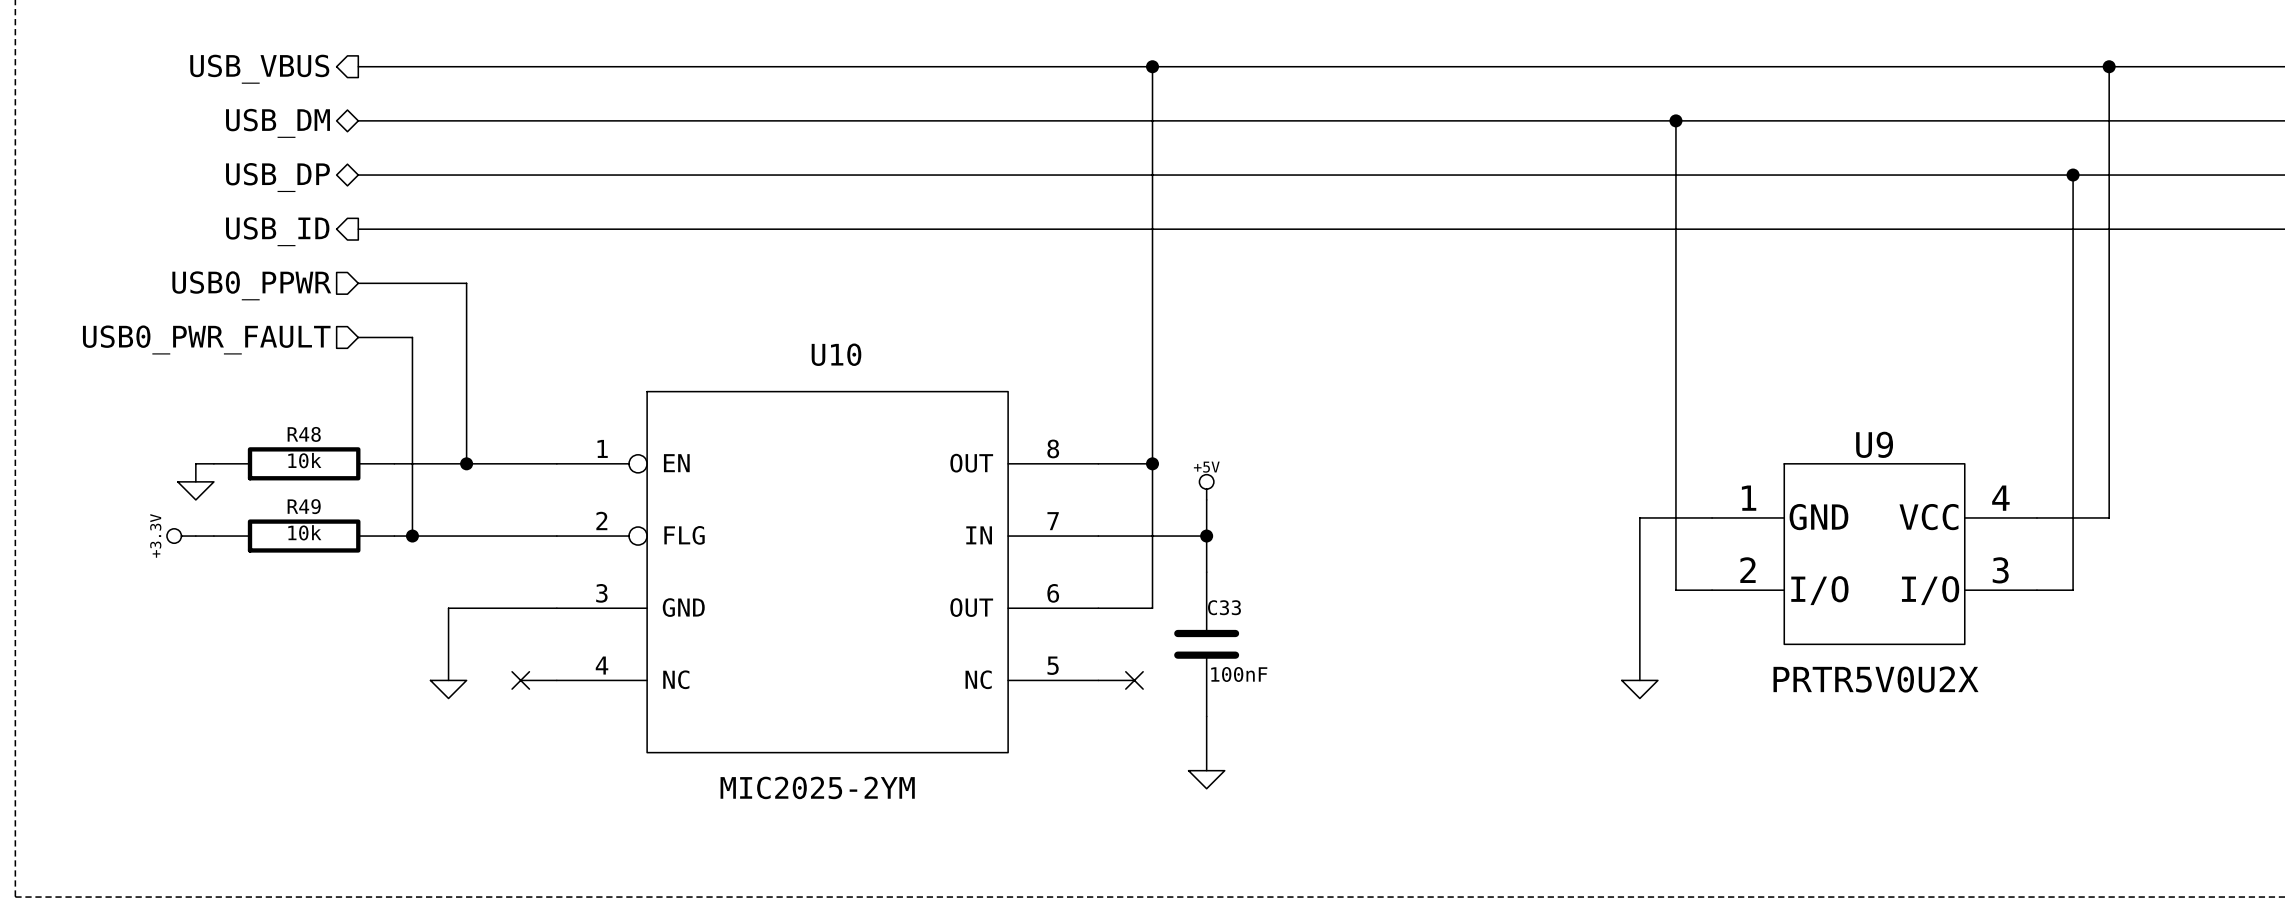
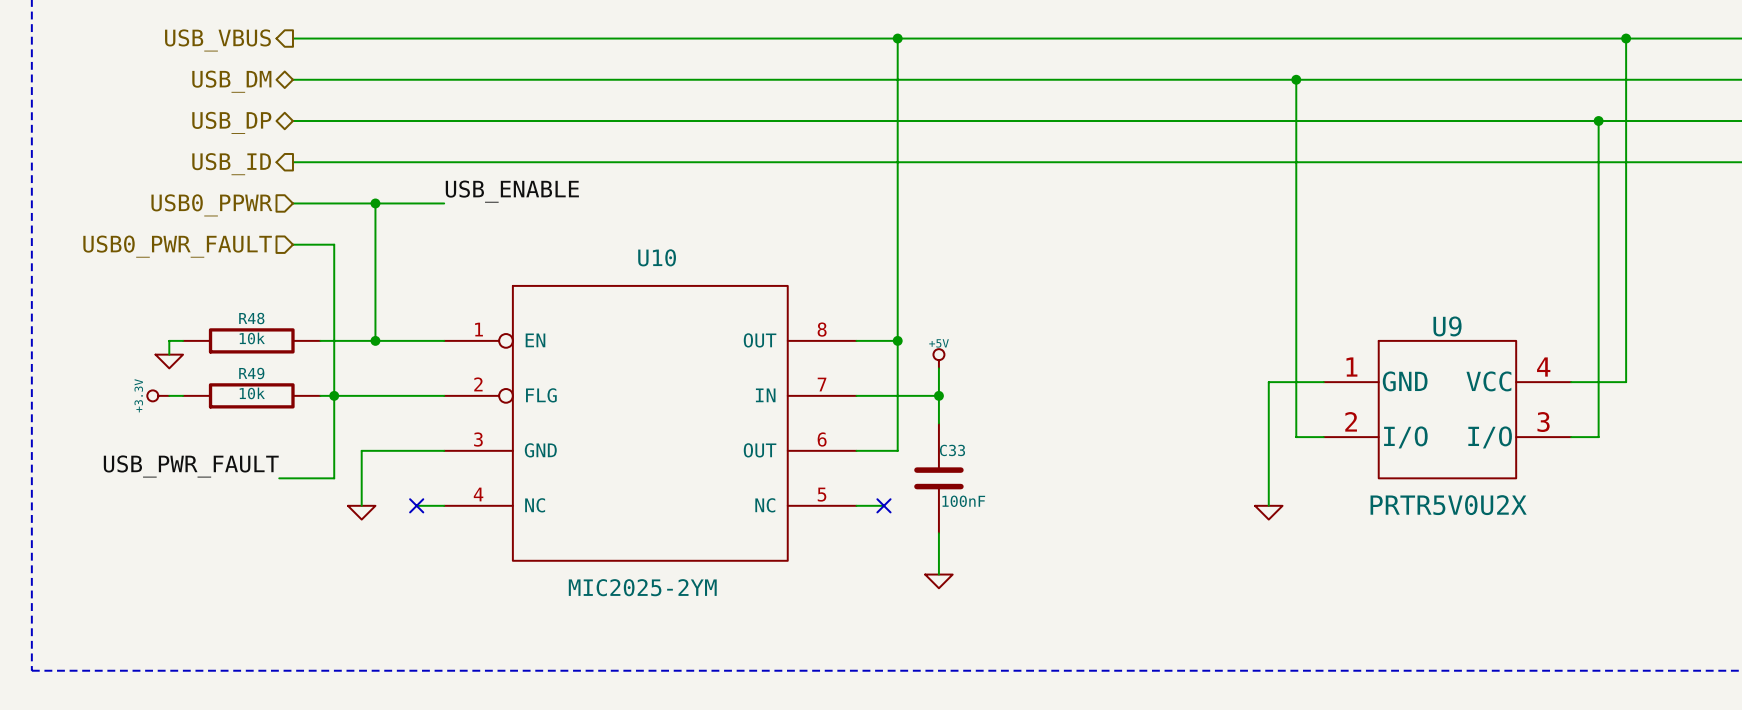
label: none -> USB_ENABLE (512, 191)
wire: none -> (375, 203) (444, 203)
junction: none -> (375, 203)
wire: none -> (334, 395) (334, 478) (279, 478)
label: none -> USB_PWR_FAULT (191, 466)

